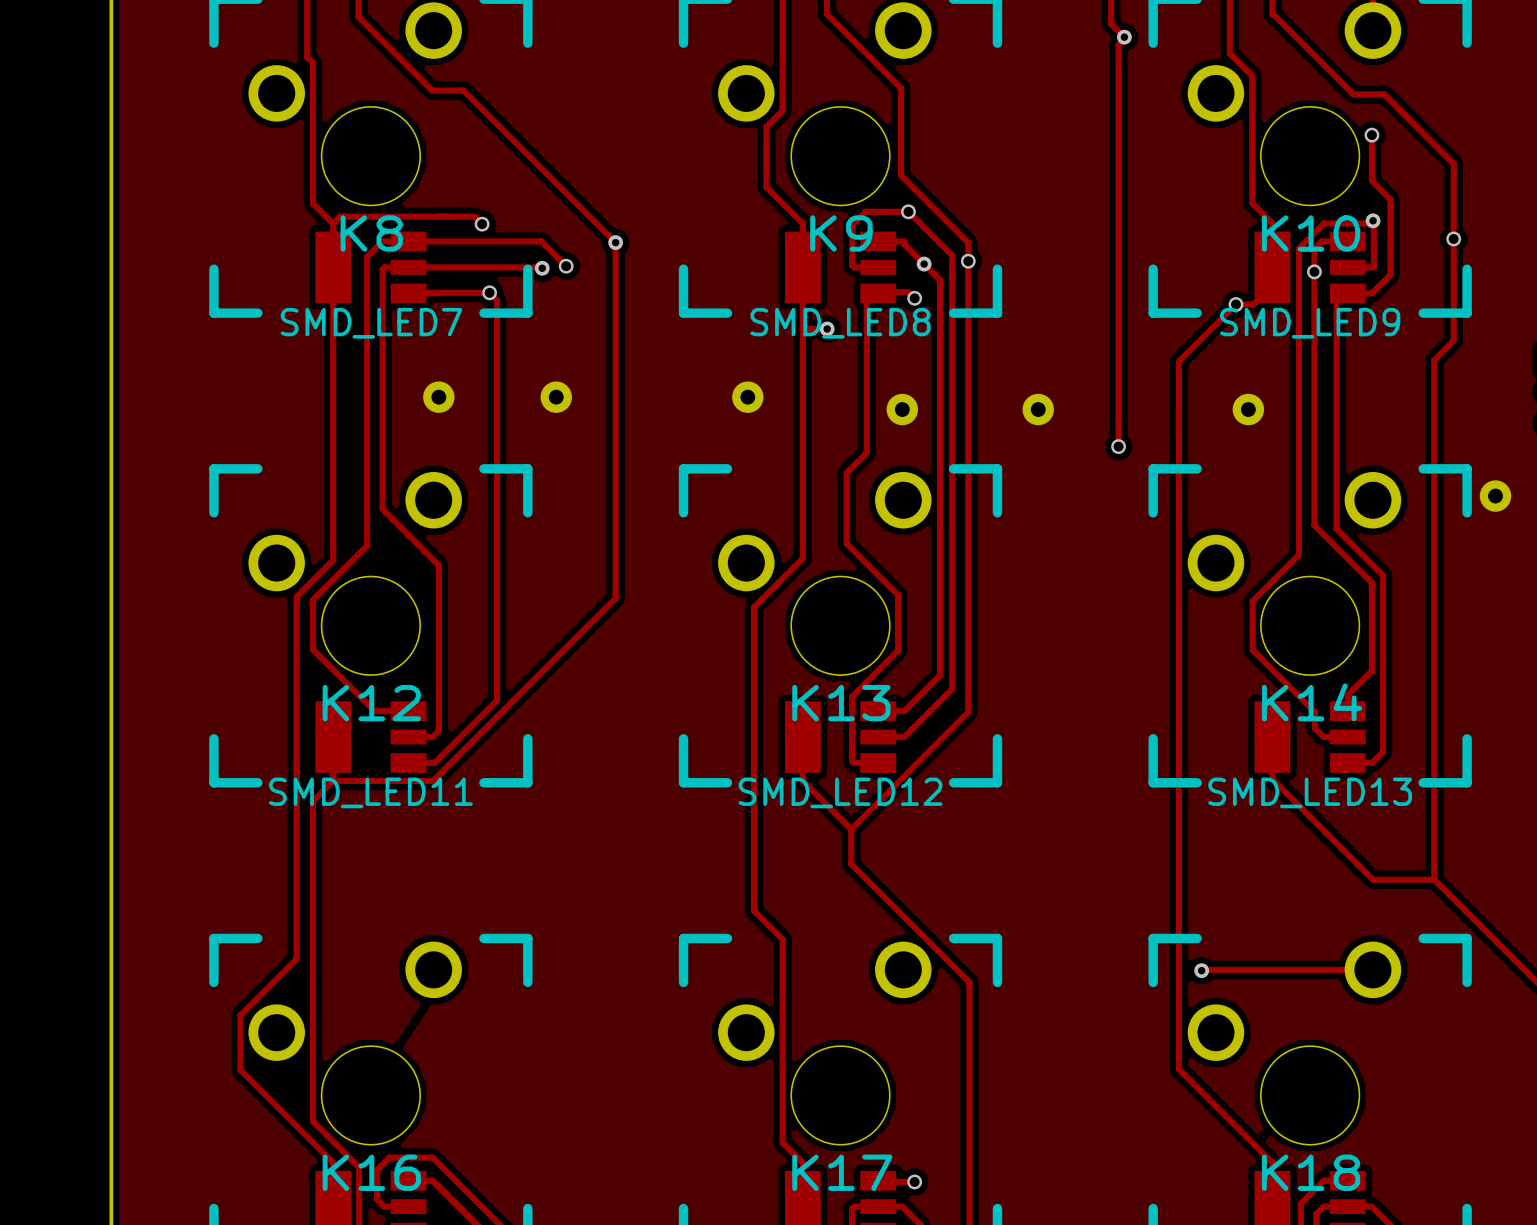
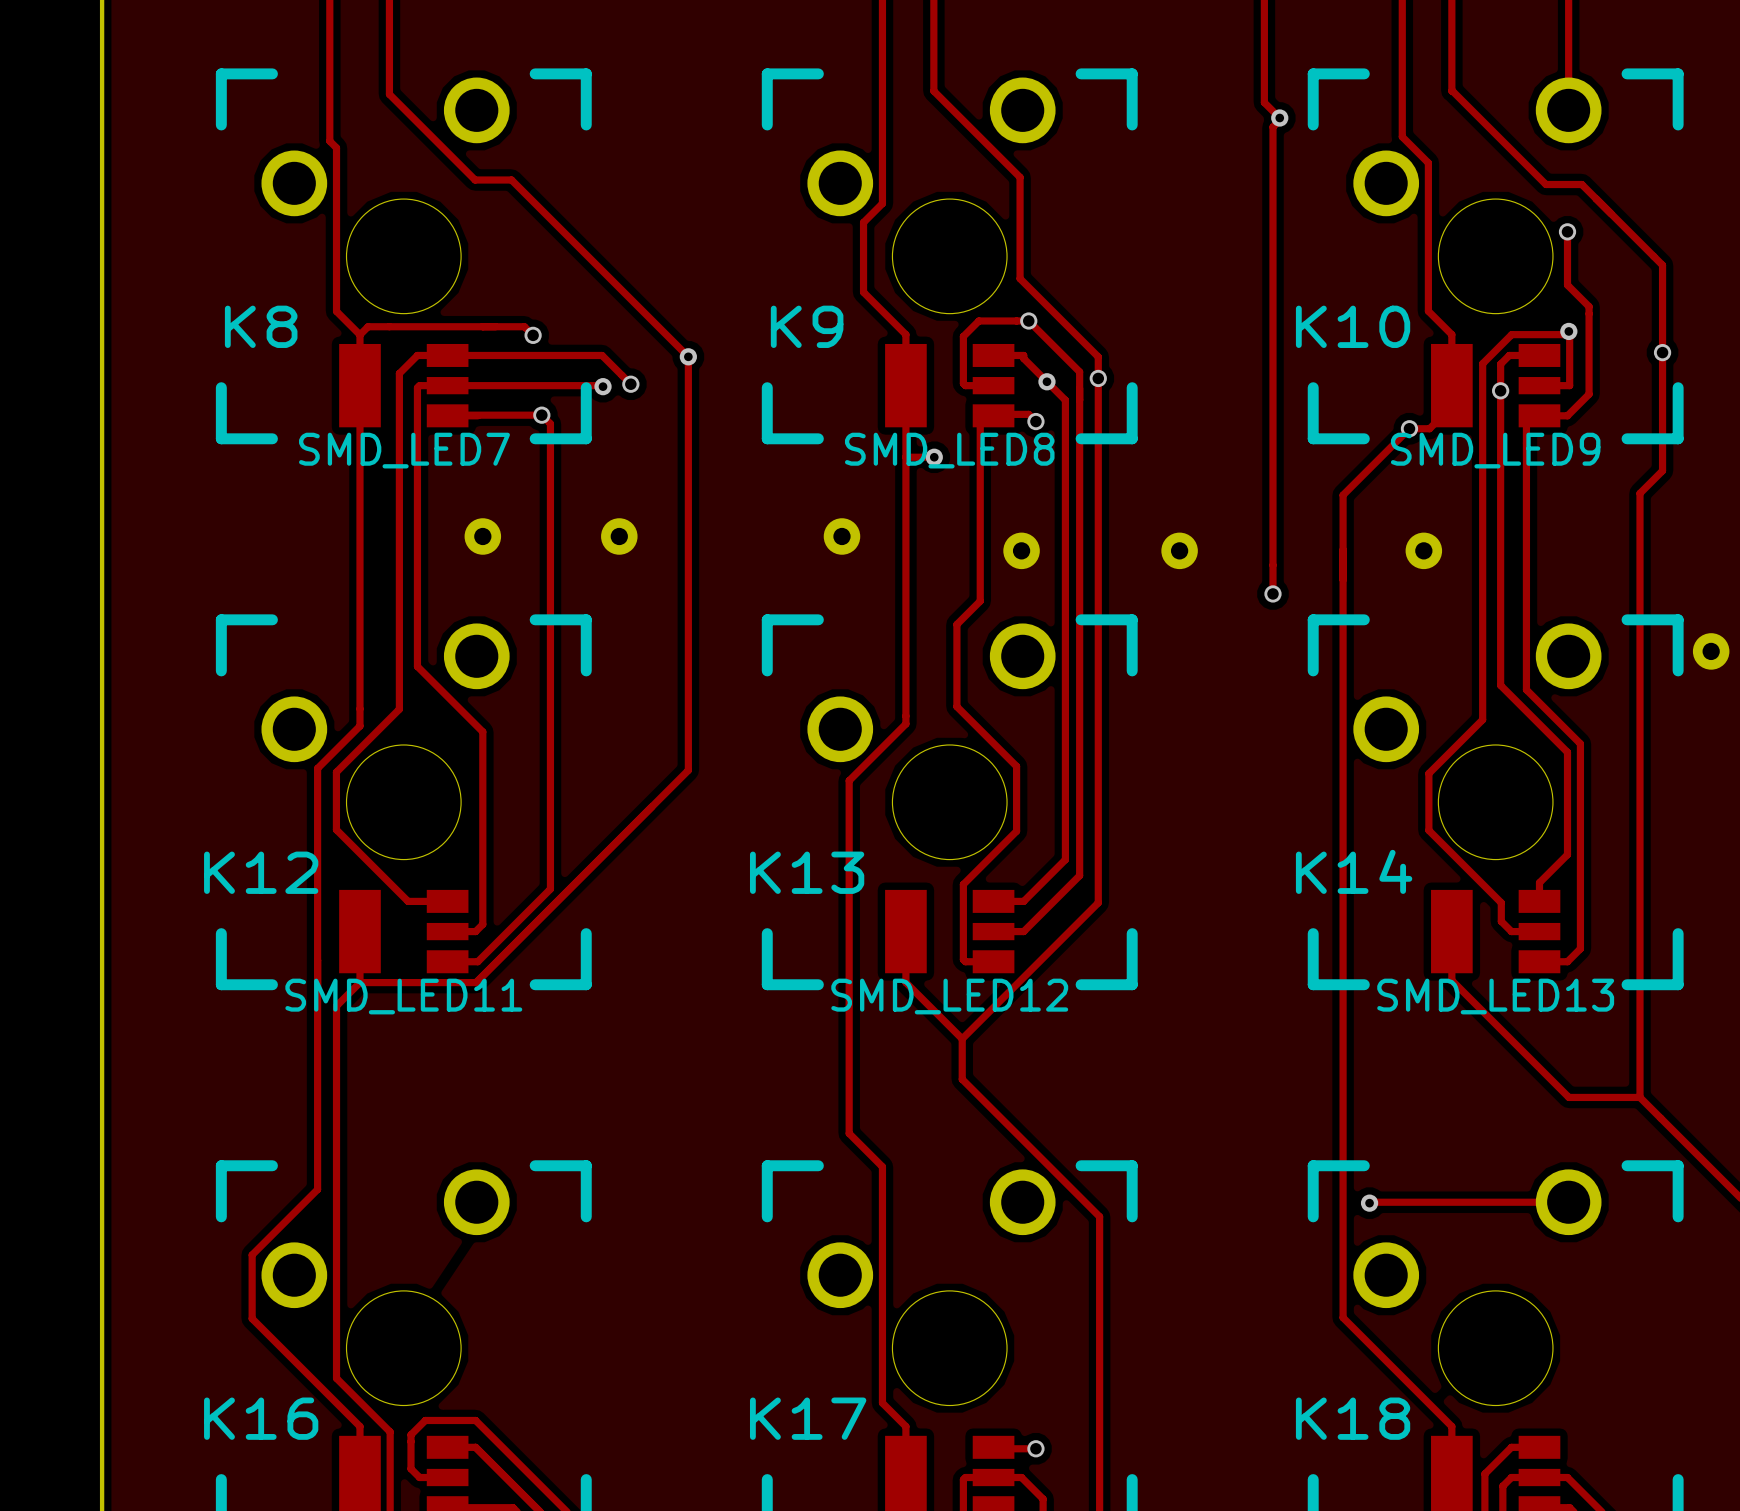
K8 name position: K8 (371, 233) -> K8 (261, 326)
K9 name position: K9 (841, 233) -> K9 (807, 326)
K10 name position: K10 (1311, 233) -> K10 (1353, 326)
K14 name position: K14 (1311, 702) -> K14 (1354, 871)
K12 name position: K12 (371, 703) -> K12 (261, 872)
K13 name position: K13 (841, 703) -> K13 (807, 872)
K16 name position: K16 (371, 1172) -> K16 (261, 1418)
K17 name position: K17 (842, 1172) -> K17 (808, 1418)
K18 name position: K18 (1311, 1172) -> K18 (1353, 1418)

